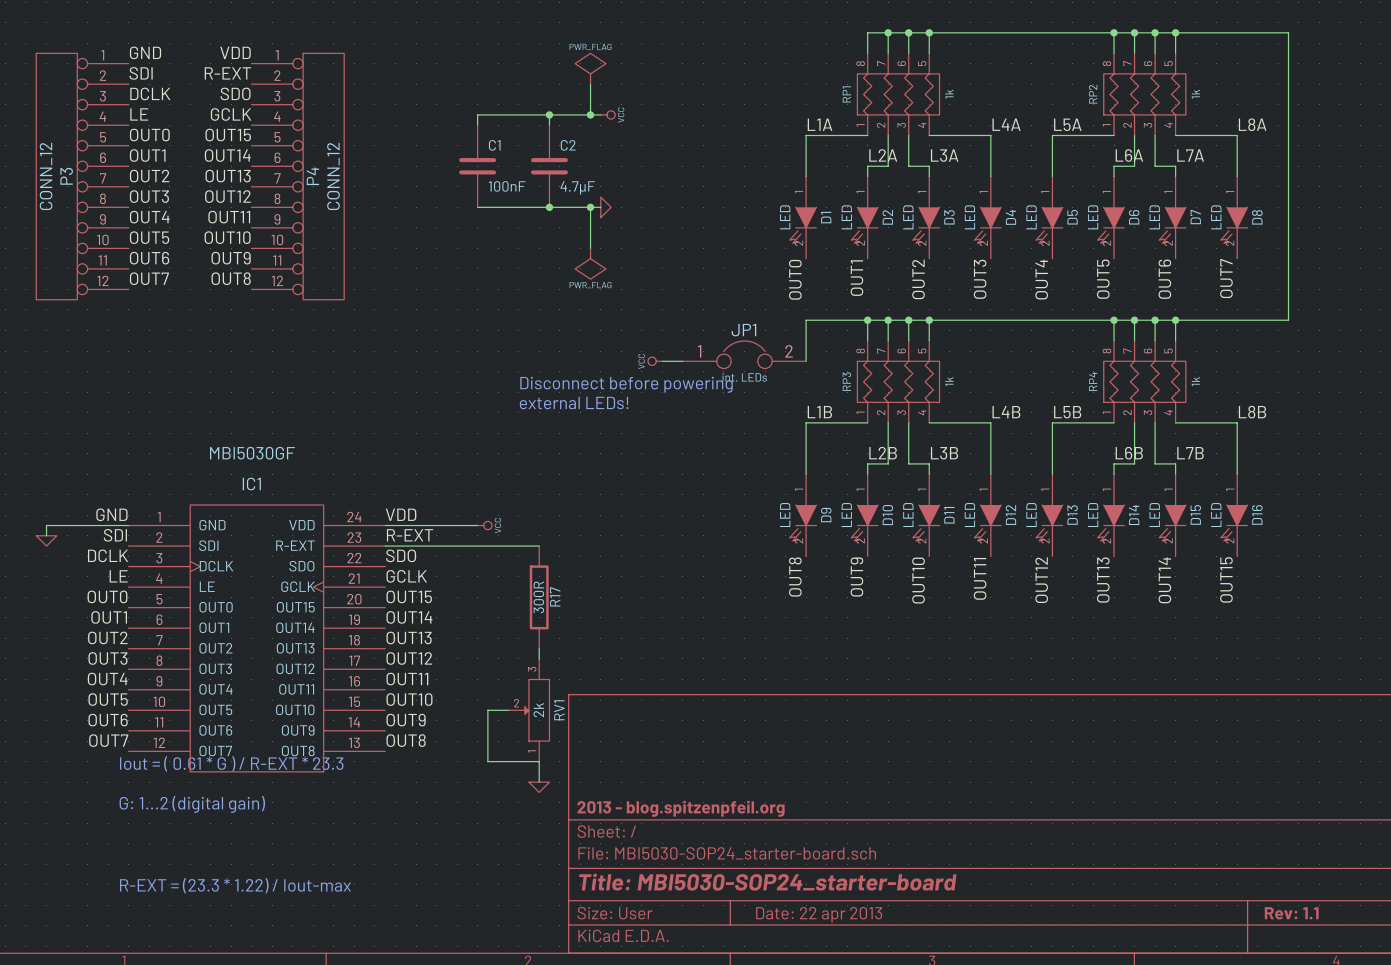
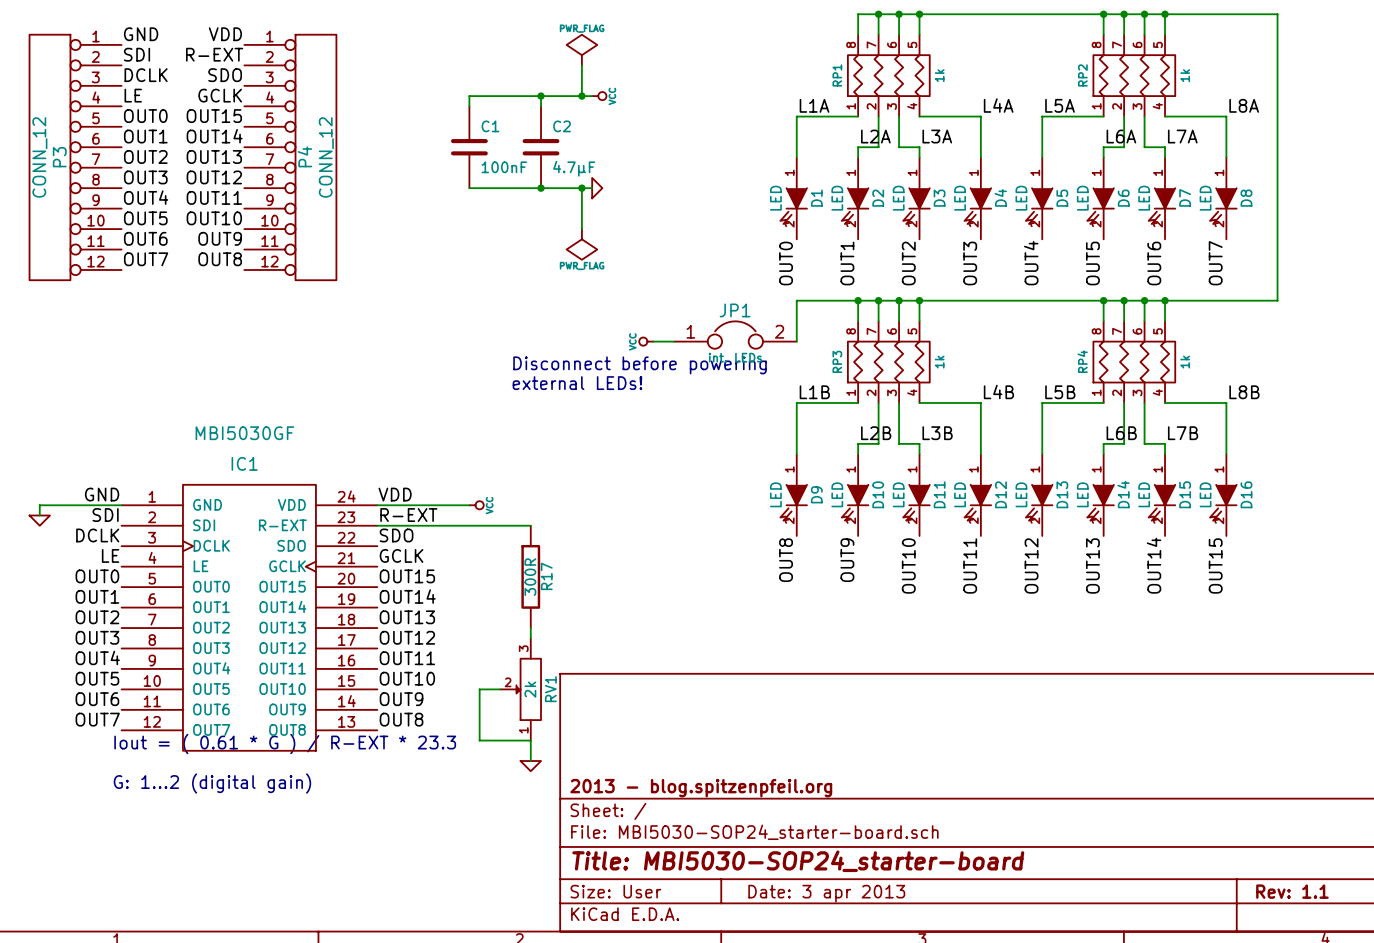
text: R-EXT = (23.3 * 1.22) / Iout-max (235, 885) -> none
title block: Date: 22 apr 2013 (819, 914) -> Date: 3 apr 2013 (826, 893)

